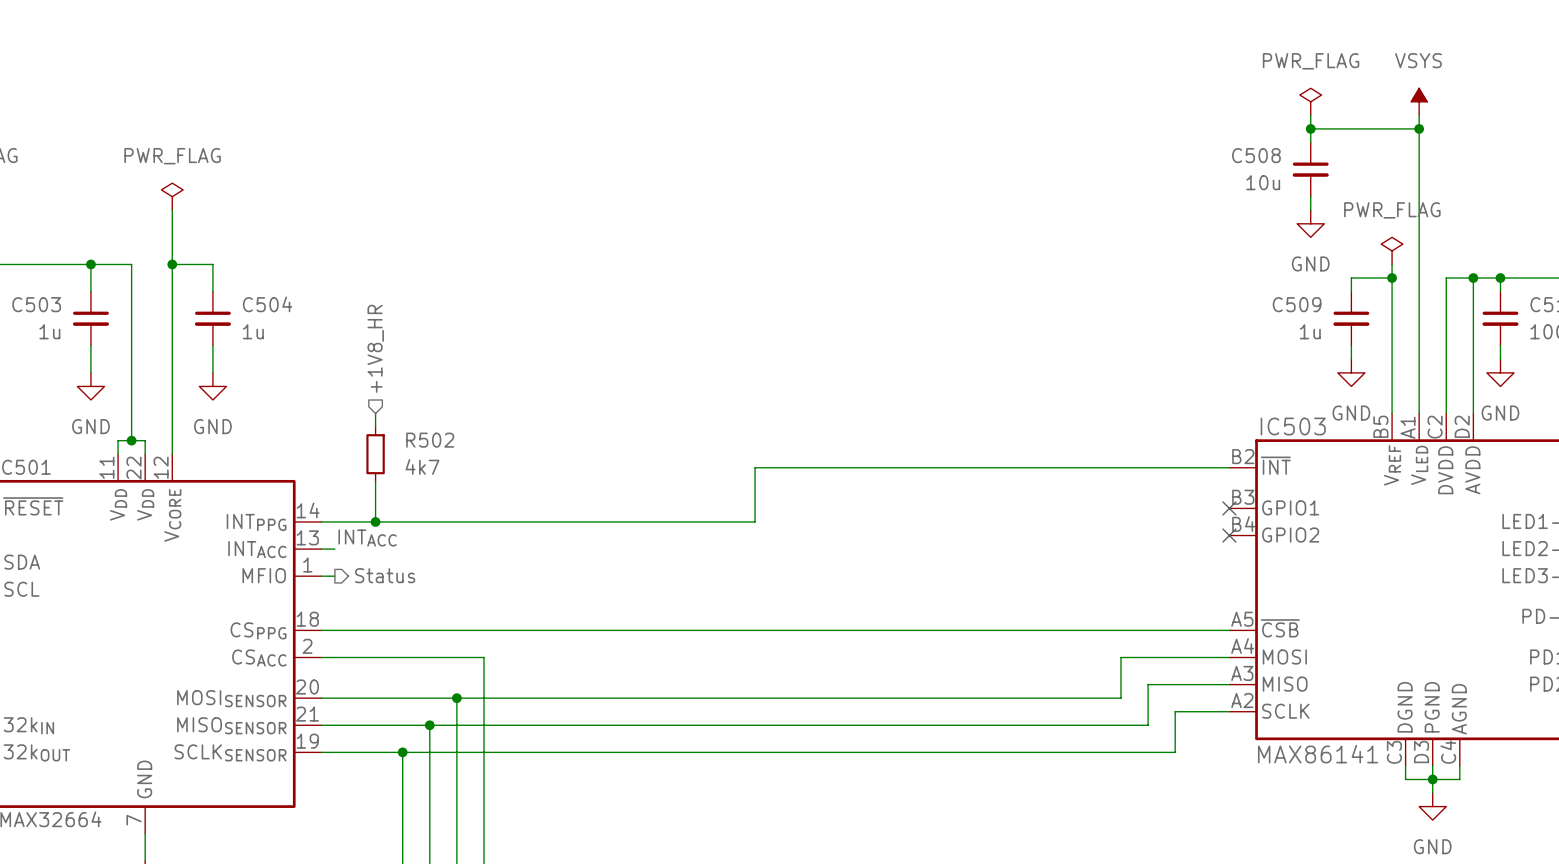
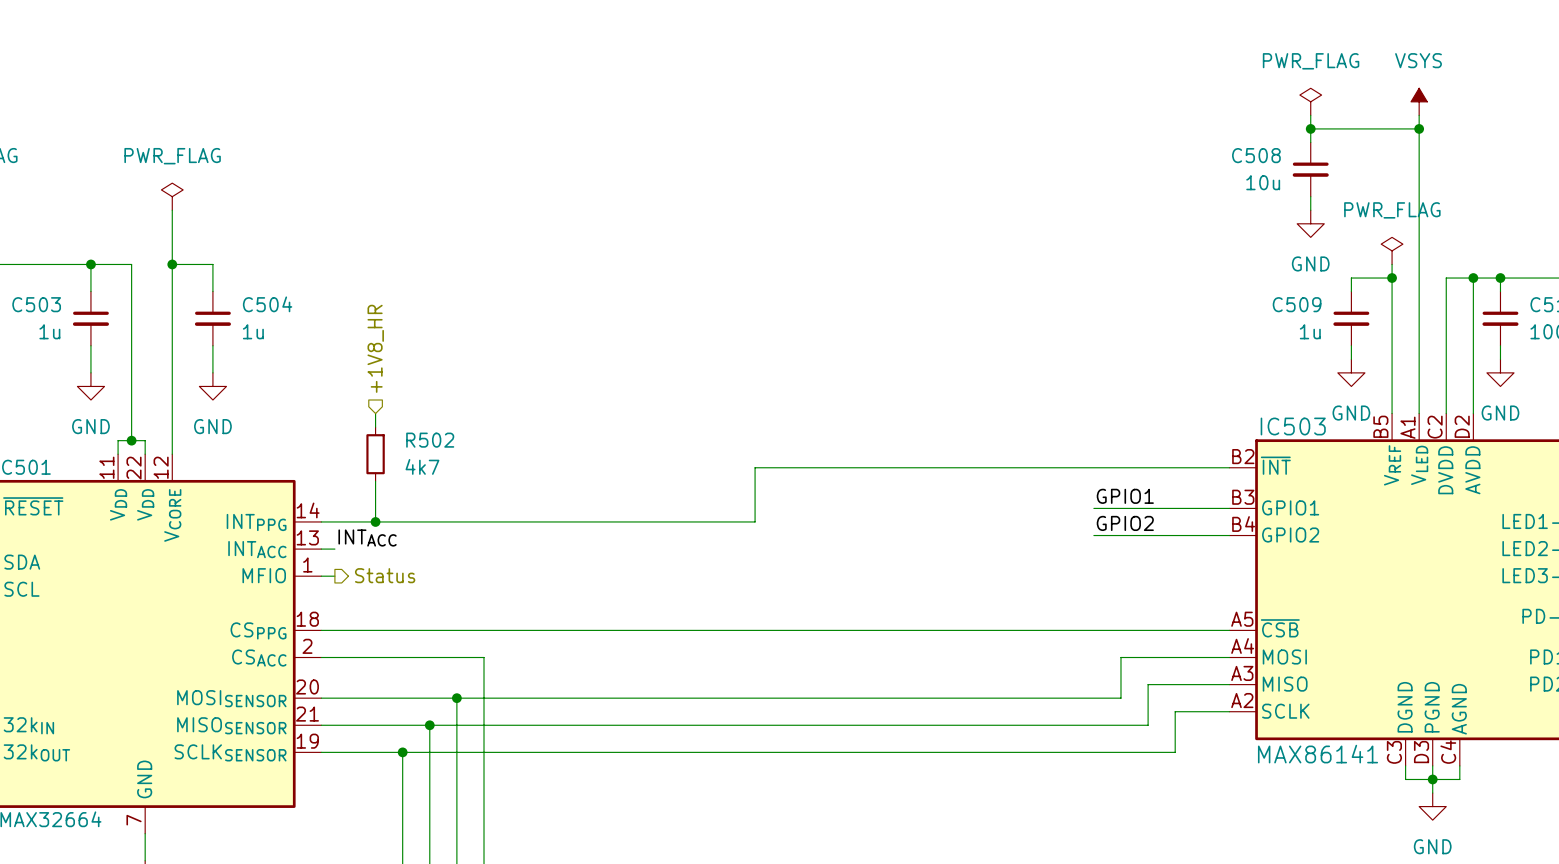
label: none -> GPIO1 (1125, 496)
wire: none -> (1093, 508) (1229, 508)
no-connect mark: (1229, 508) -> none
label: none -> GPIO2 (1125, 523)
wire: none -> (1093, 535) (1229, 535)
no-connect mark: (1229, 535) -> none

